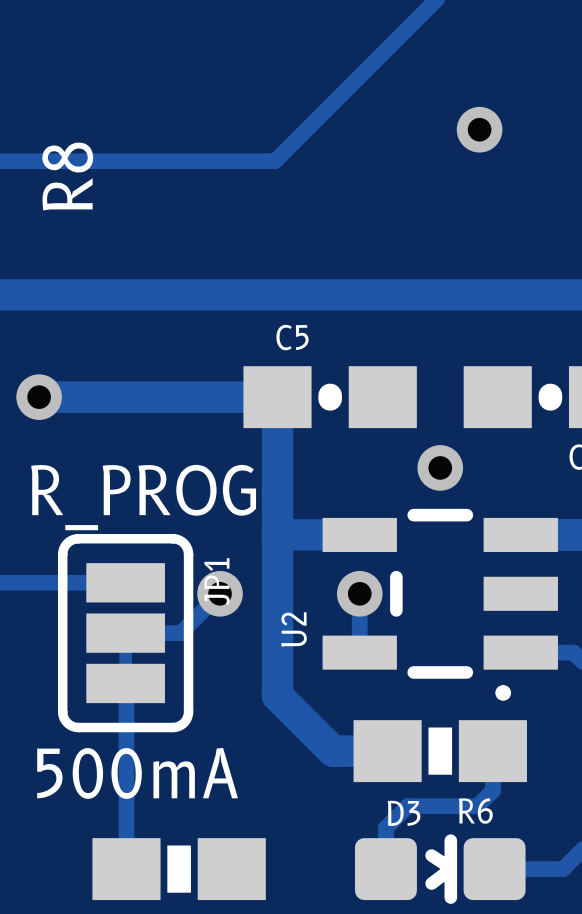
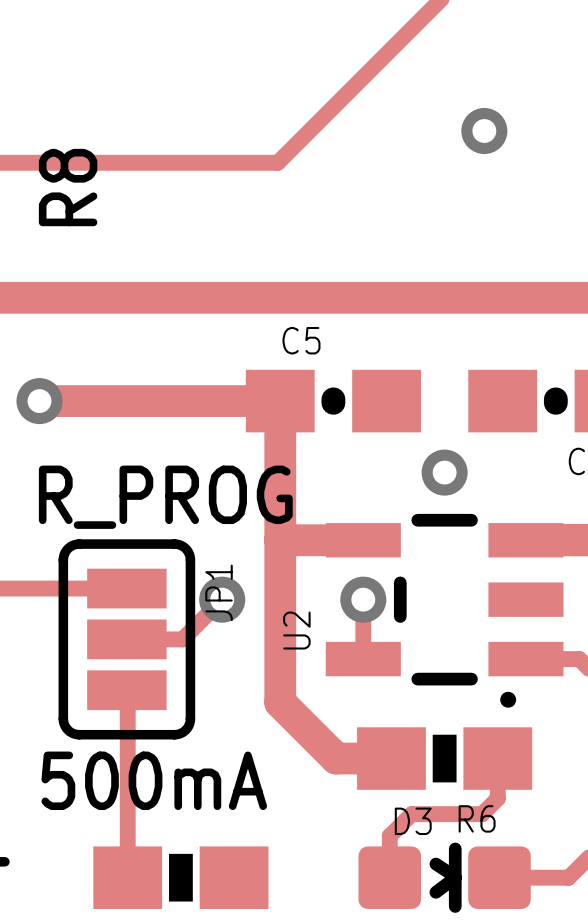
JP1 footprint: [57, 534, 194, 733] -> [58, 539, 196, 740]

